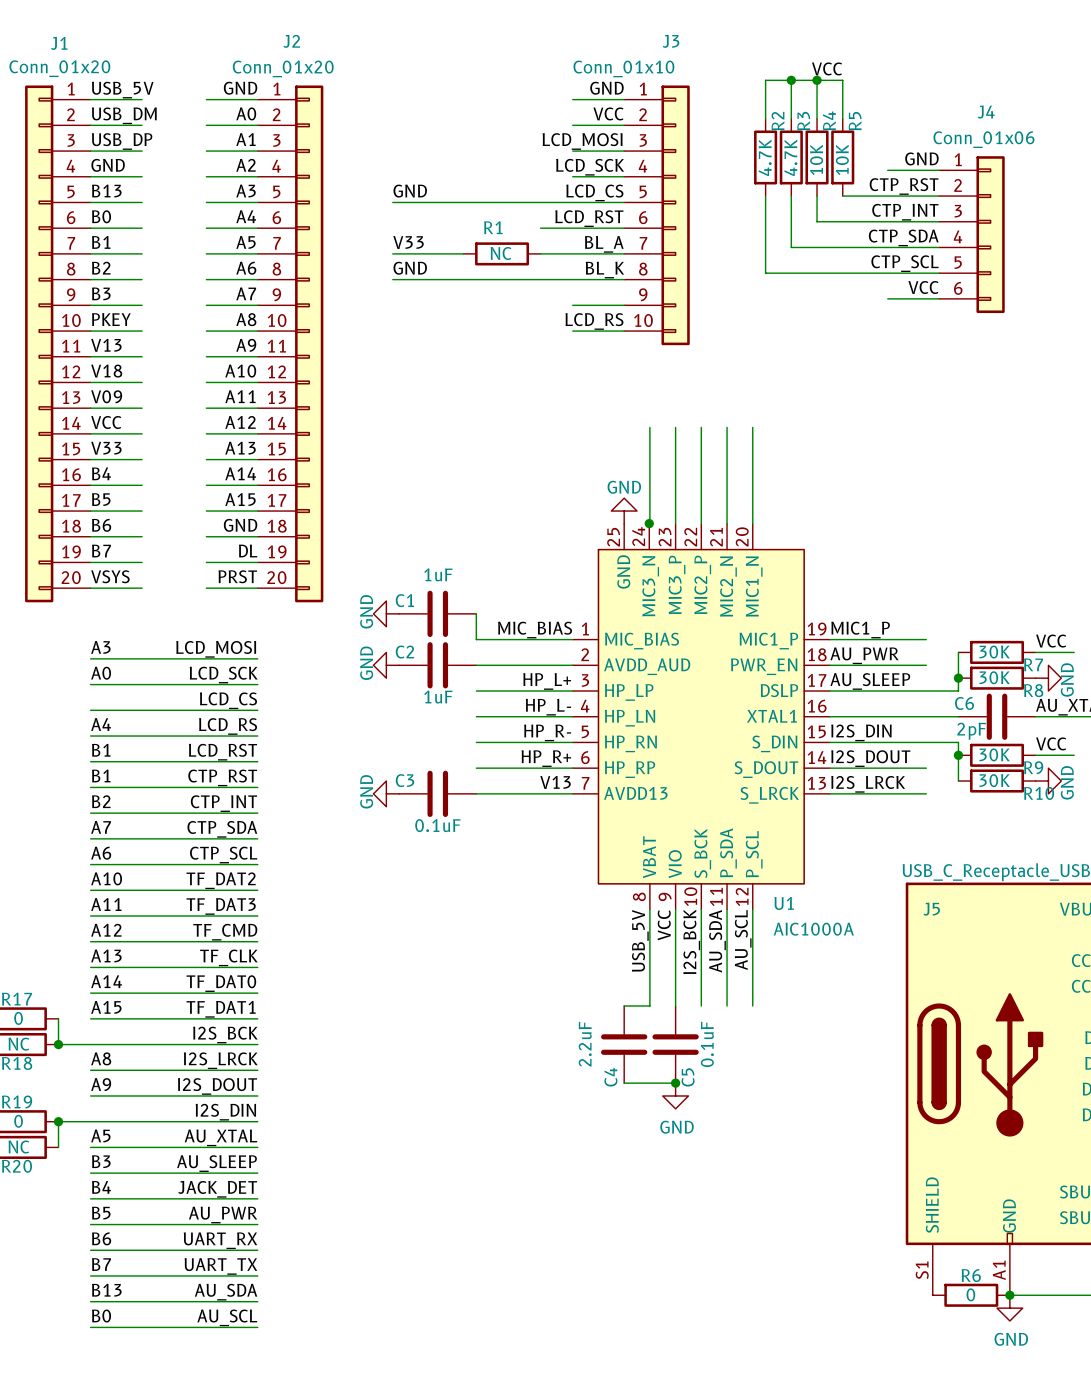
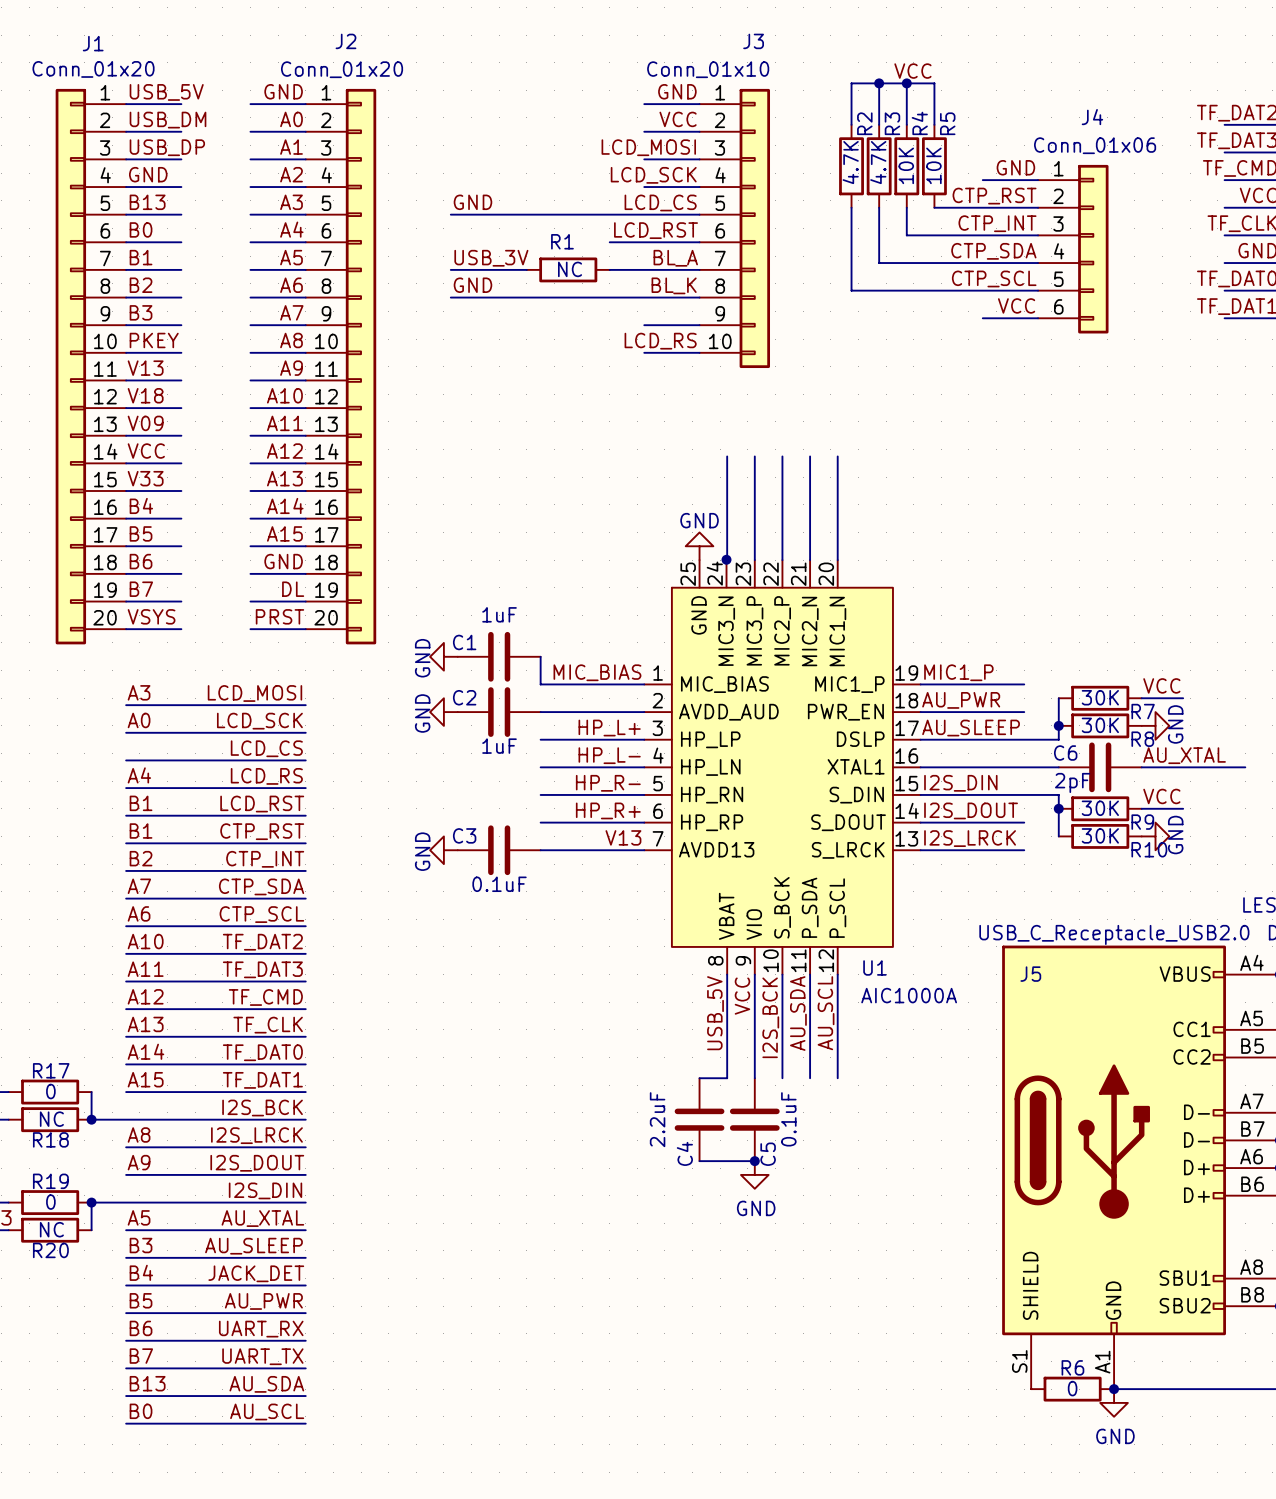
label: V33 (408, 242) -> USB_3V (491, 258)

